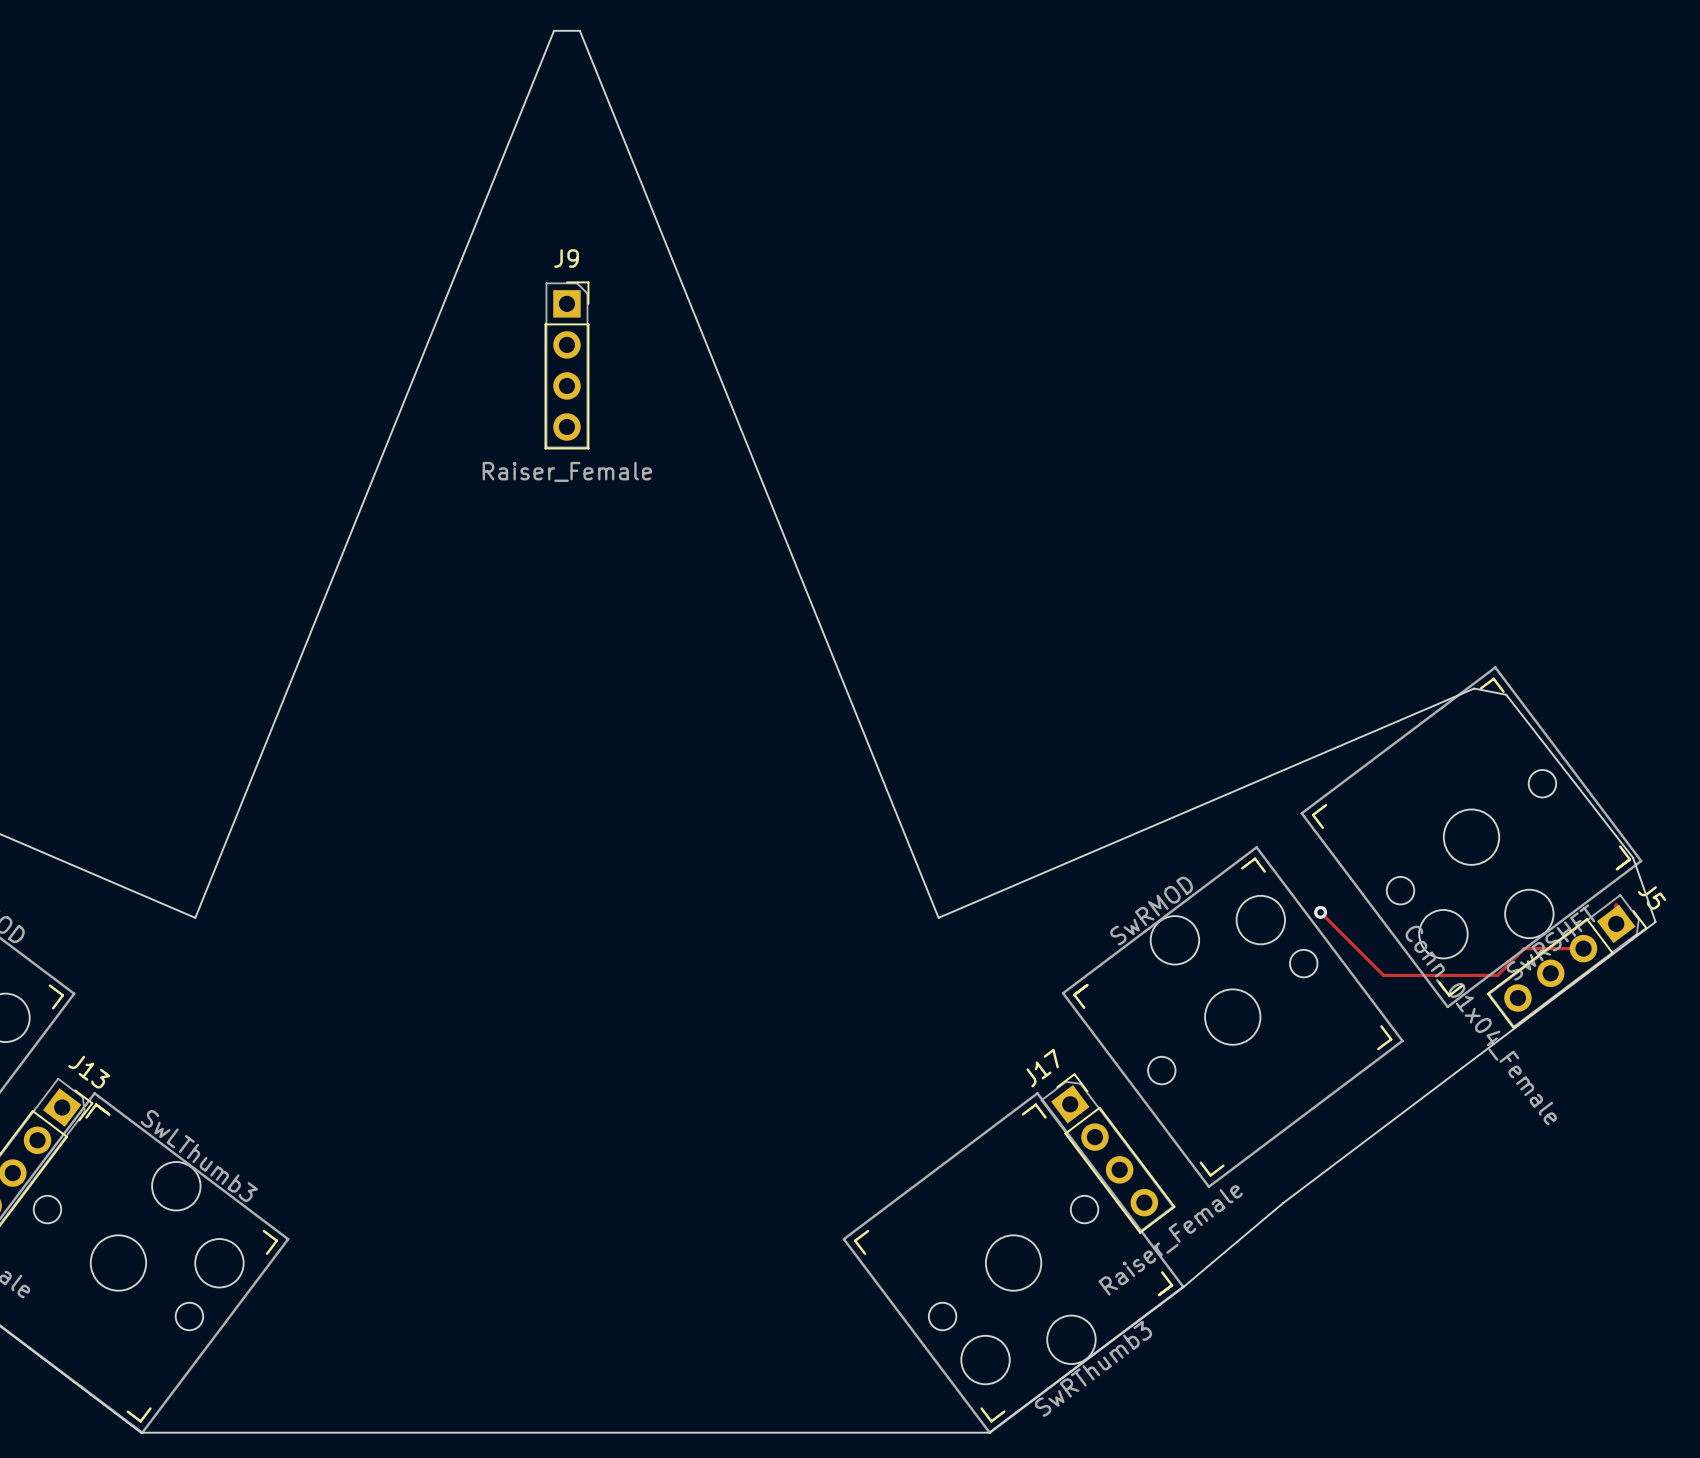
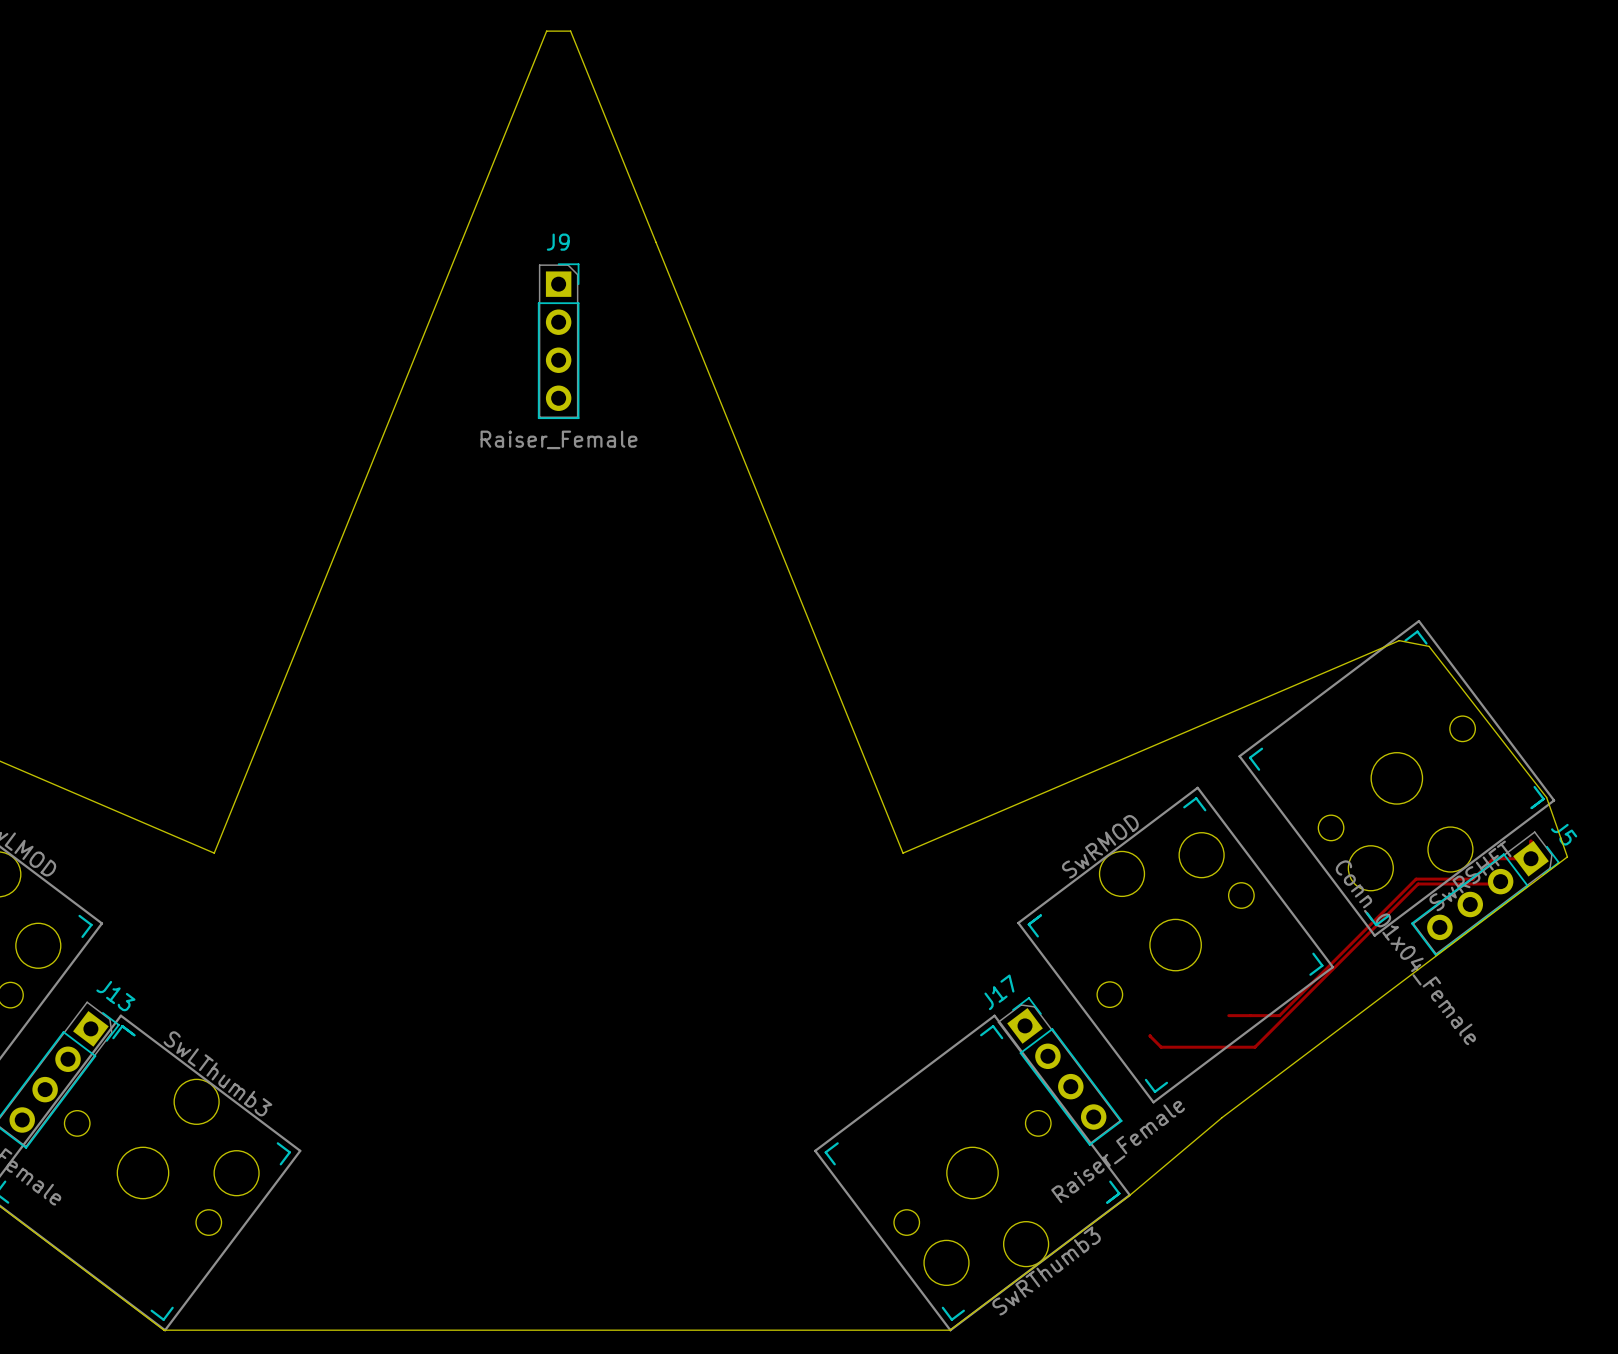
track: (1320, 912) (1383, 975) (1497, 975) (1524, 948) (1583, 948) -> none
via: (1320, 912) -> none
track: none -> (1531, 858) (1493, 858) (1473, 879) (1416, 879) (1279, 1015) (1228, 1015)
track: none -> (1498, 884) (1418, 884) (1254, 1047) (1161, 1047) (1150, 1035)

